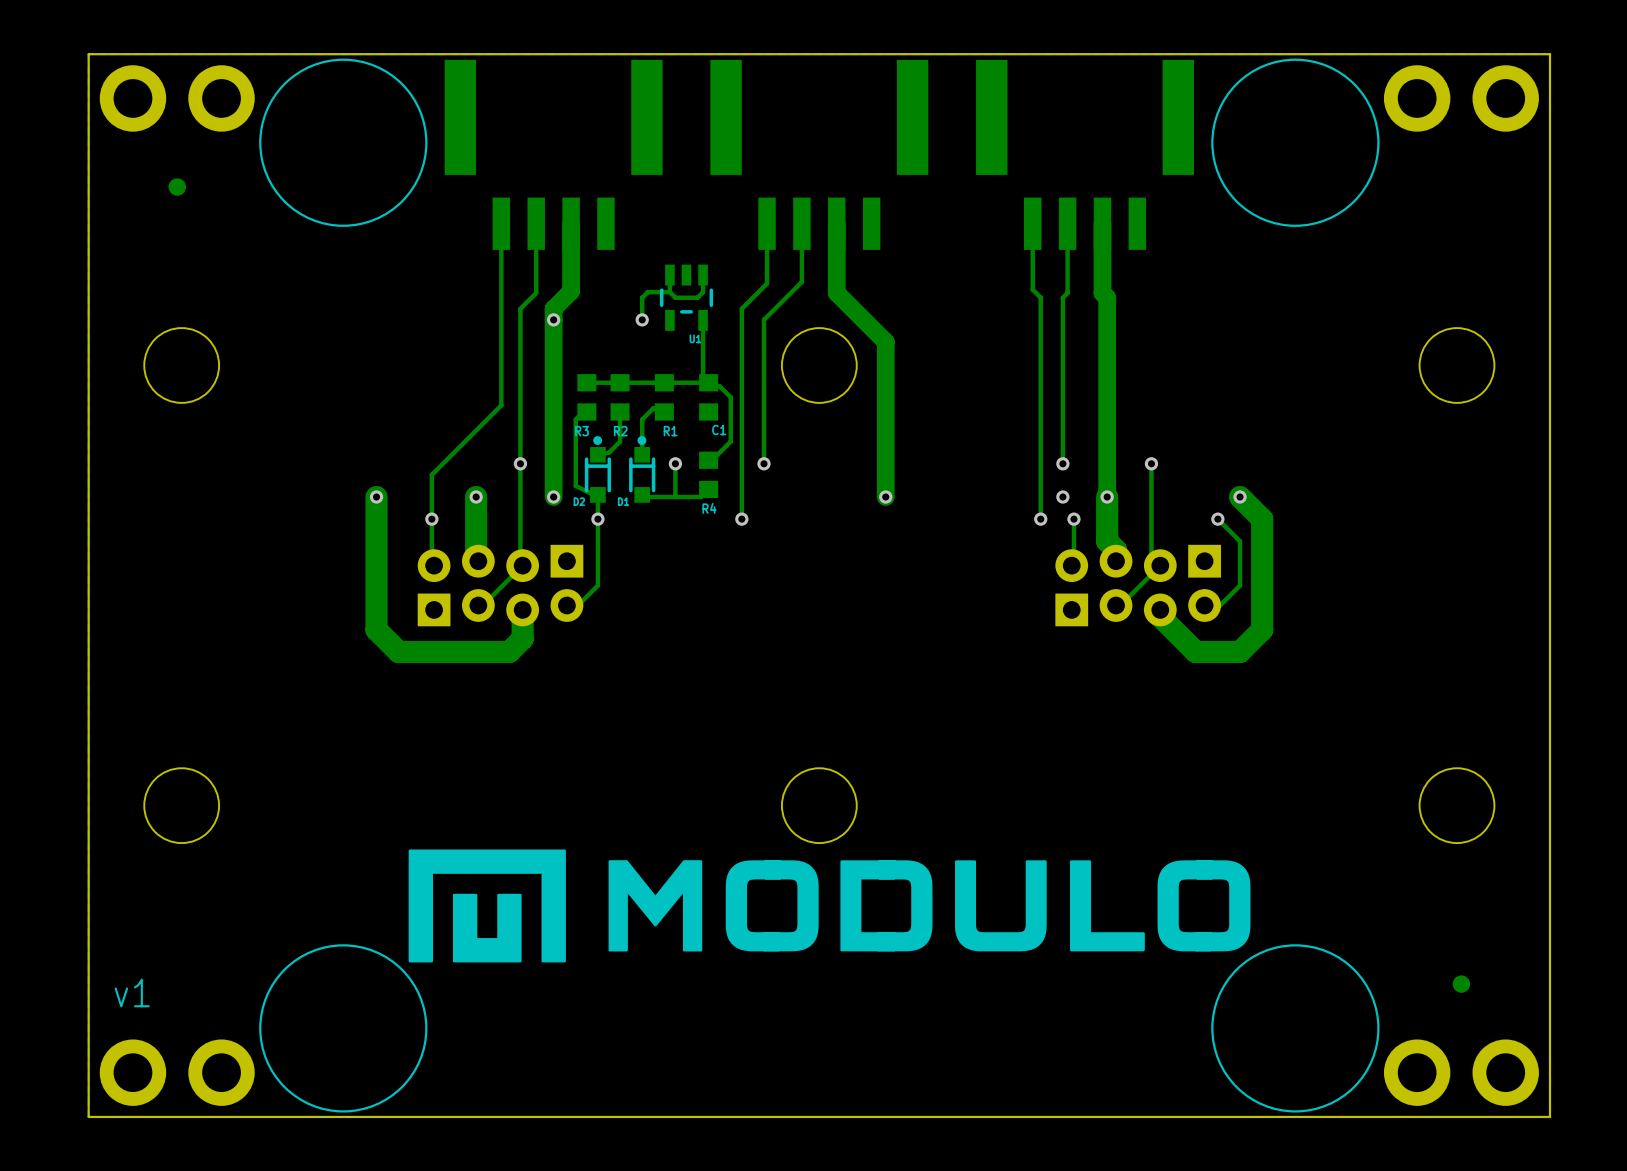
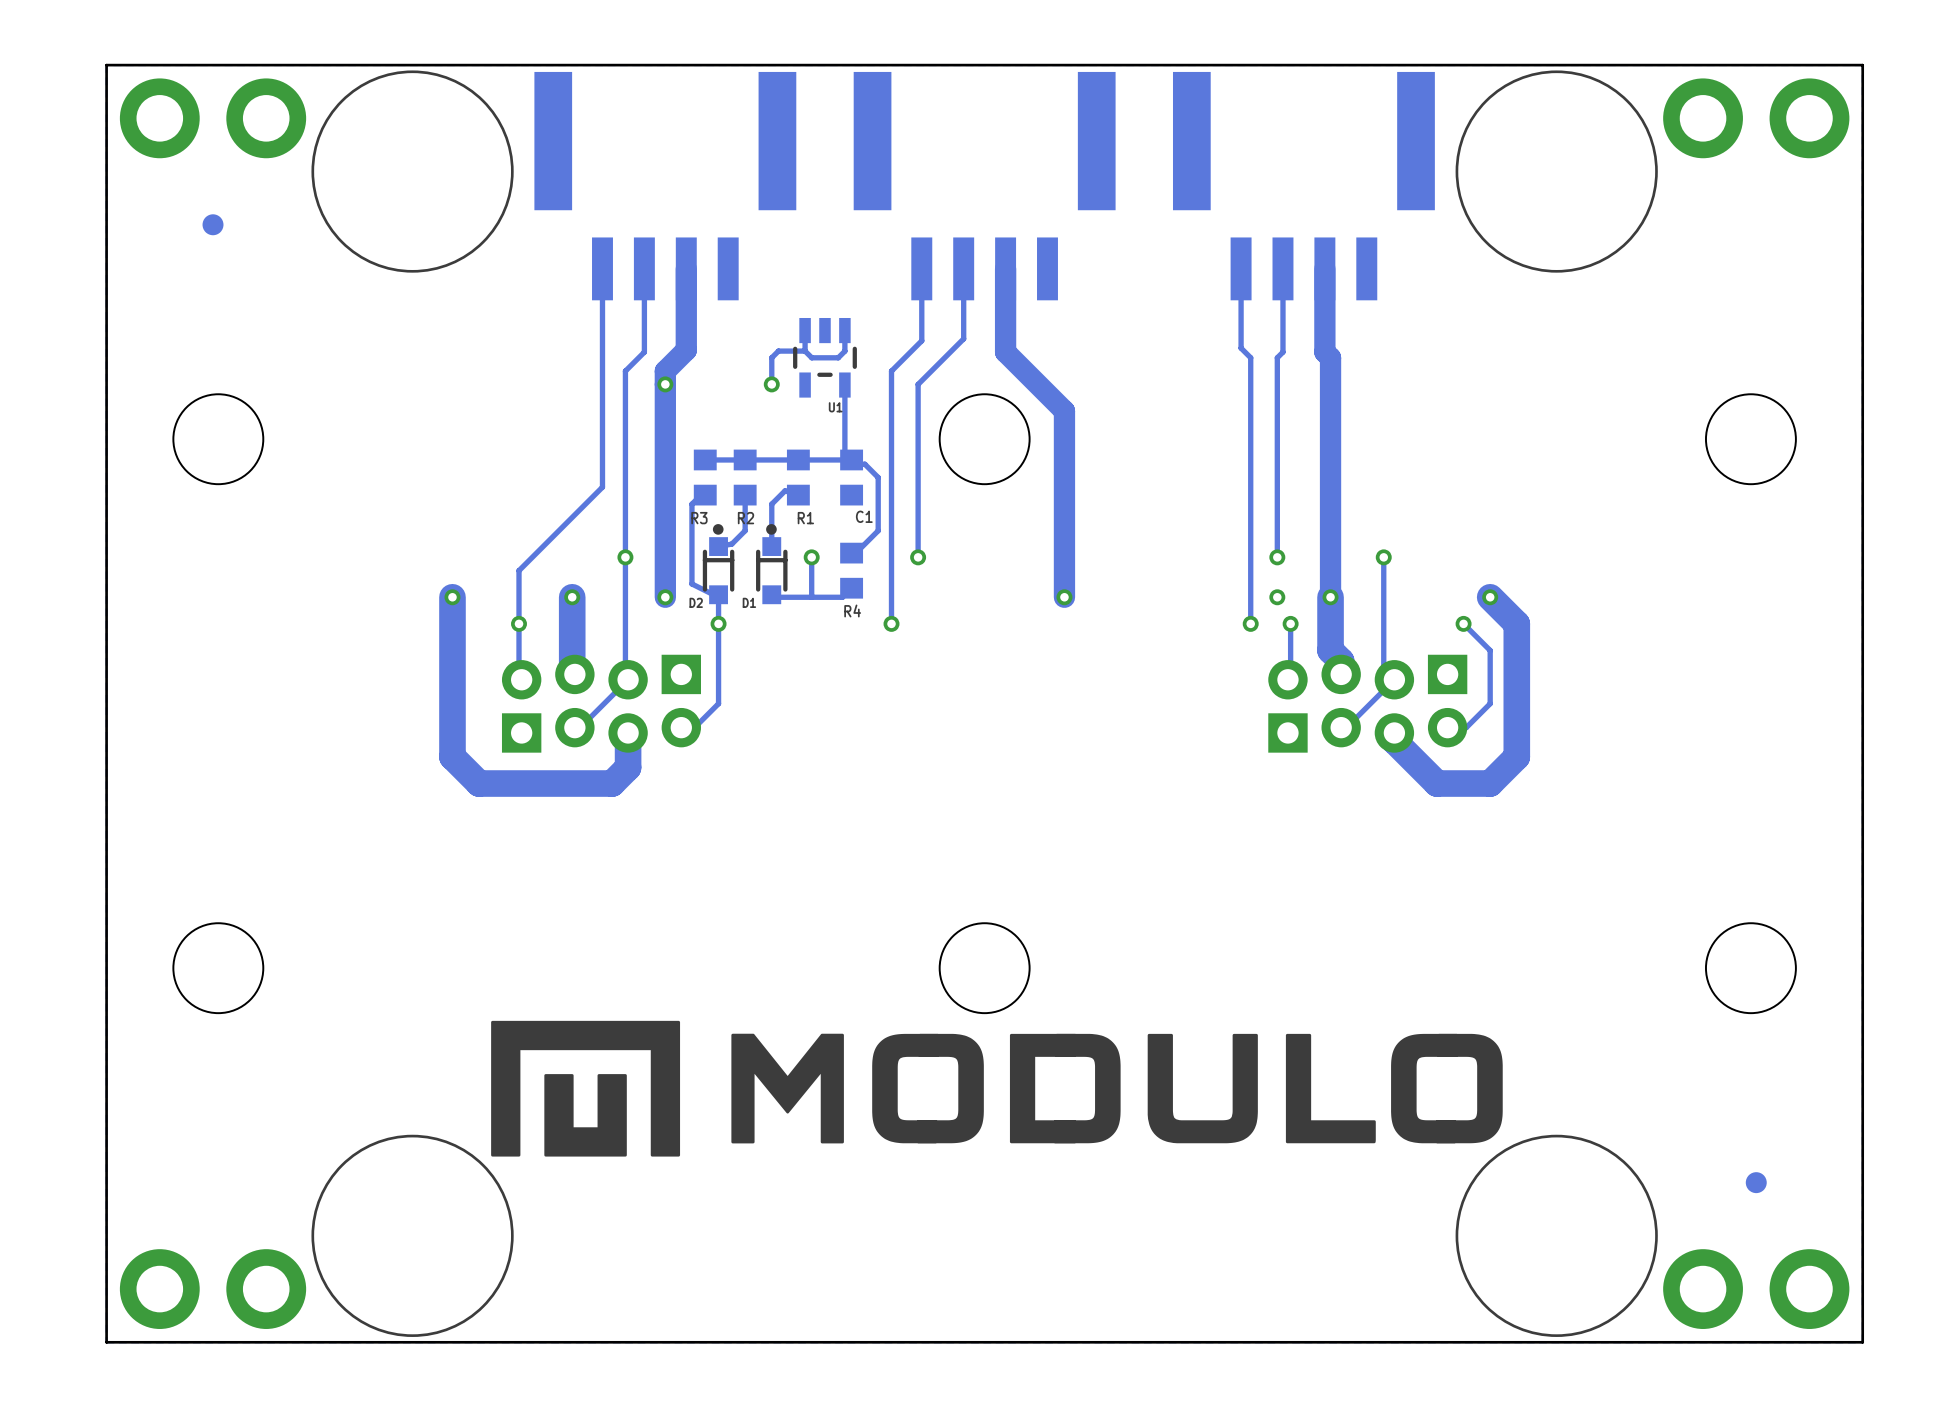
text: v1 (132, 992) -> none

